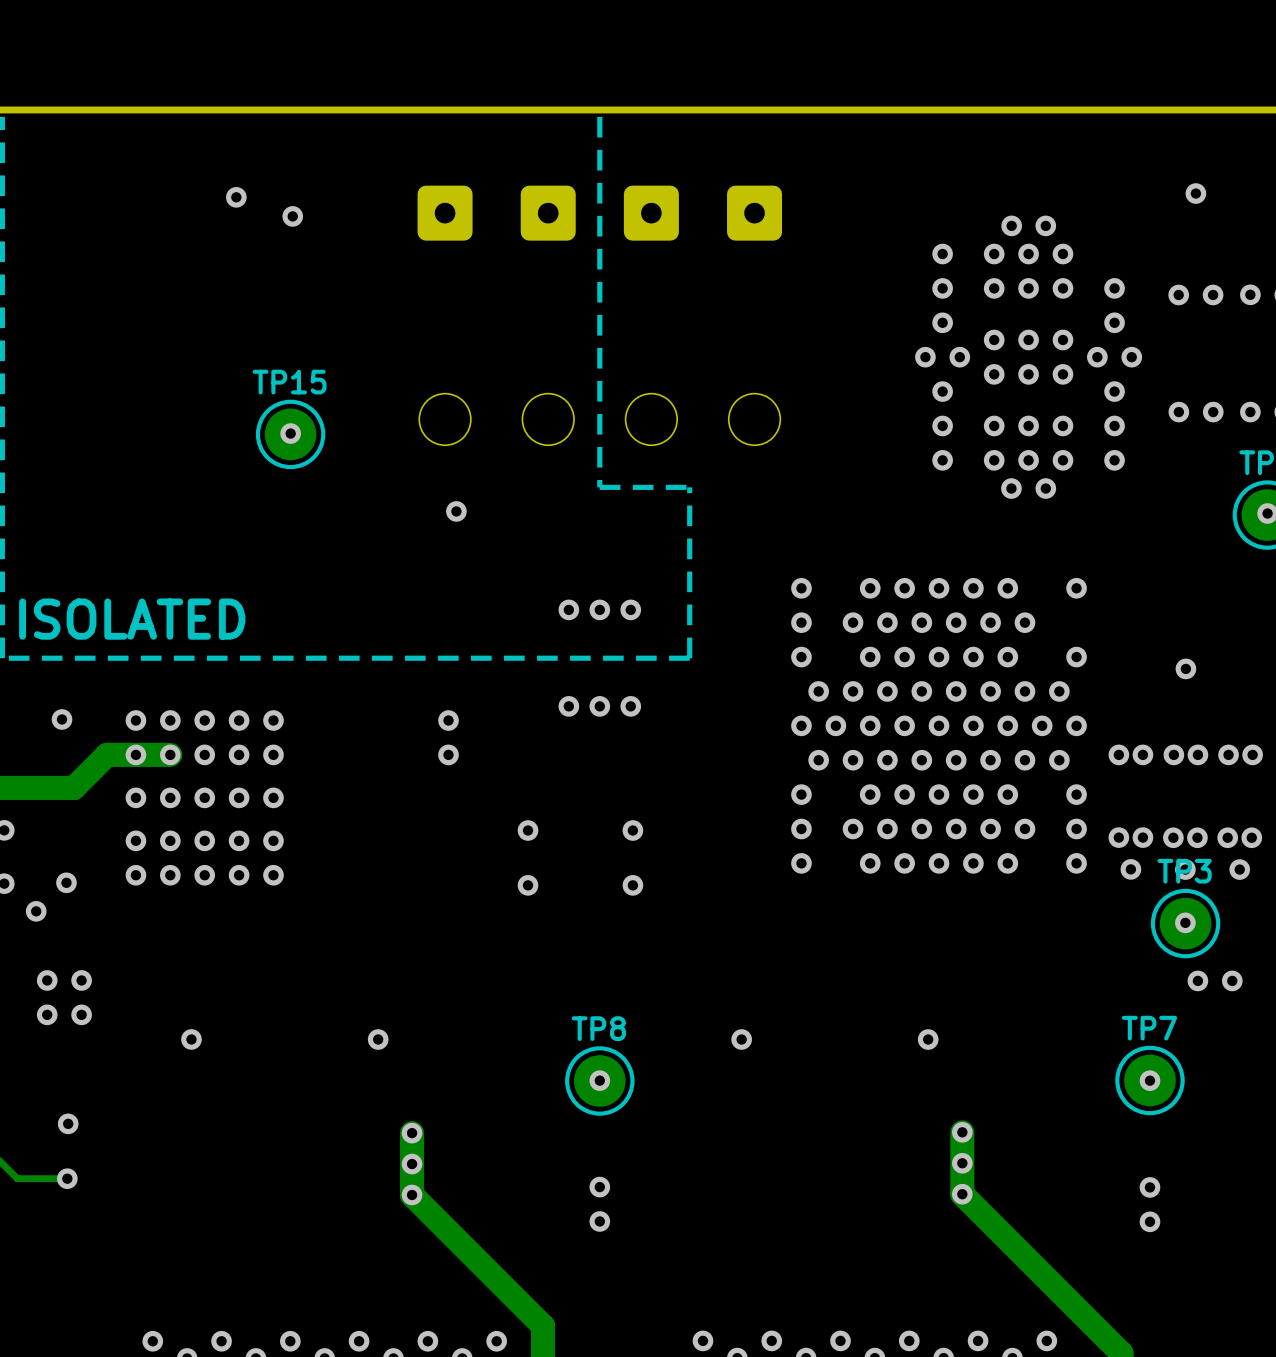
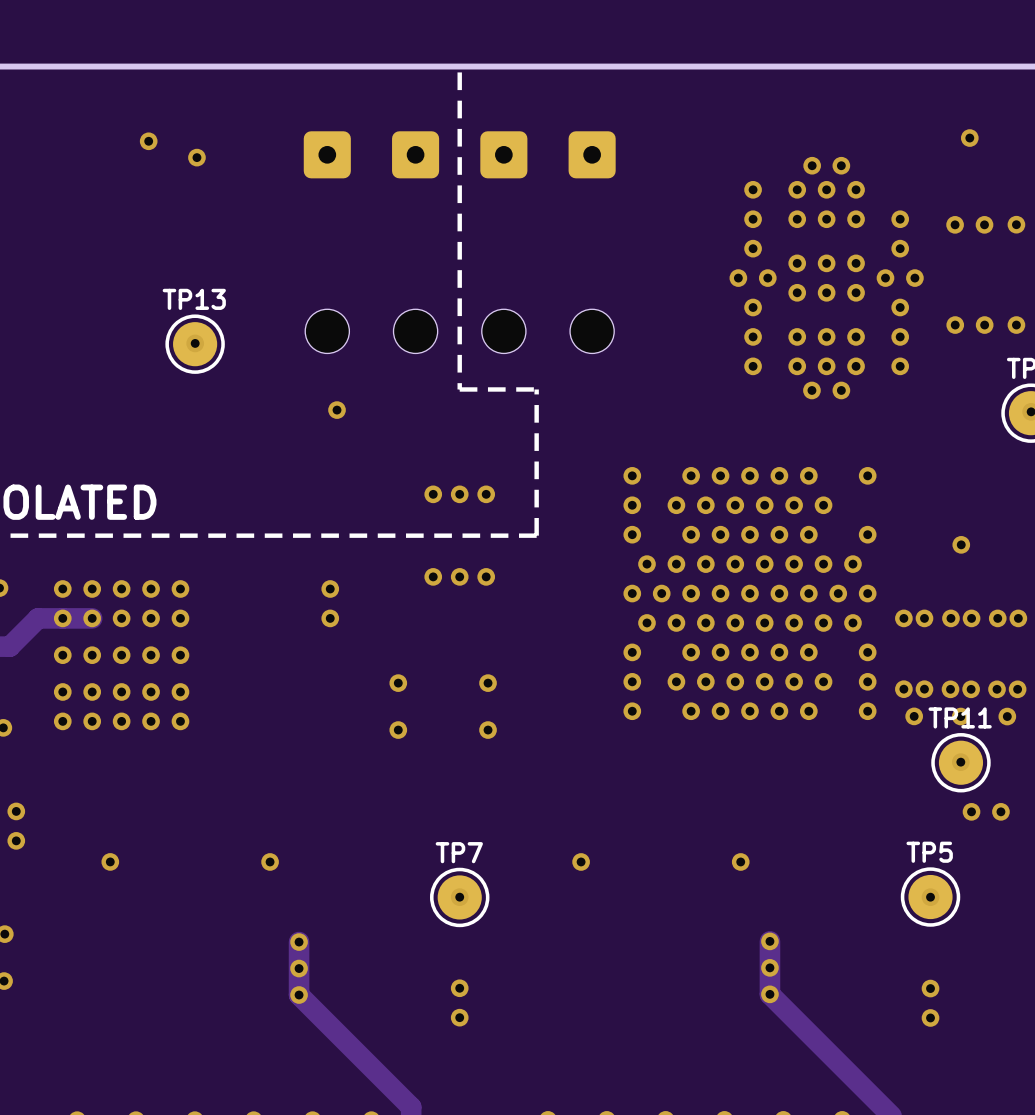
TP15 name: TP15 (289, 382) -> TP13 (194, 299)
TP3 name: TP3 (1184, 871) -> TP11 (960, 717)
TP8 name: TP8 (598, 1028) -> TP7 (459, 852)
TP7 name: TP7 (1149, 1028) -> TP5 (929, 852)

